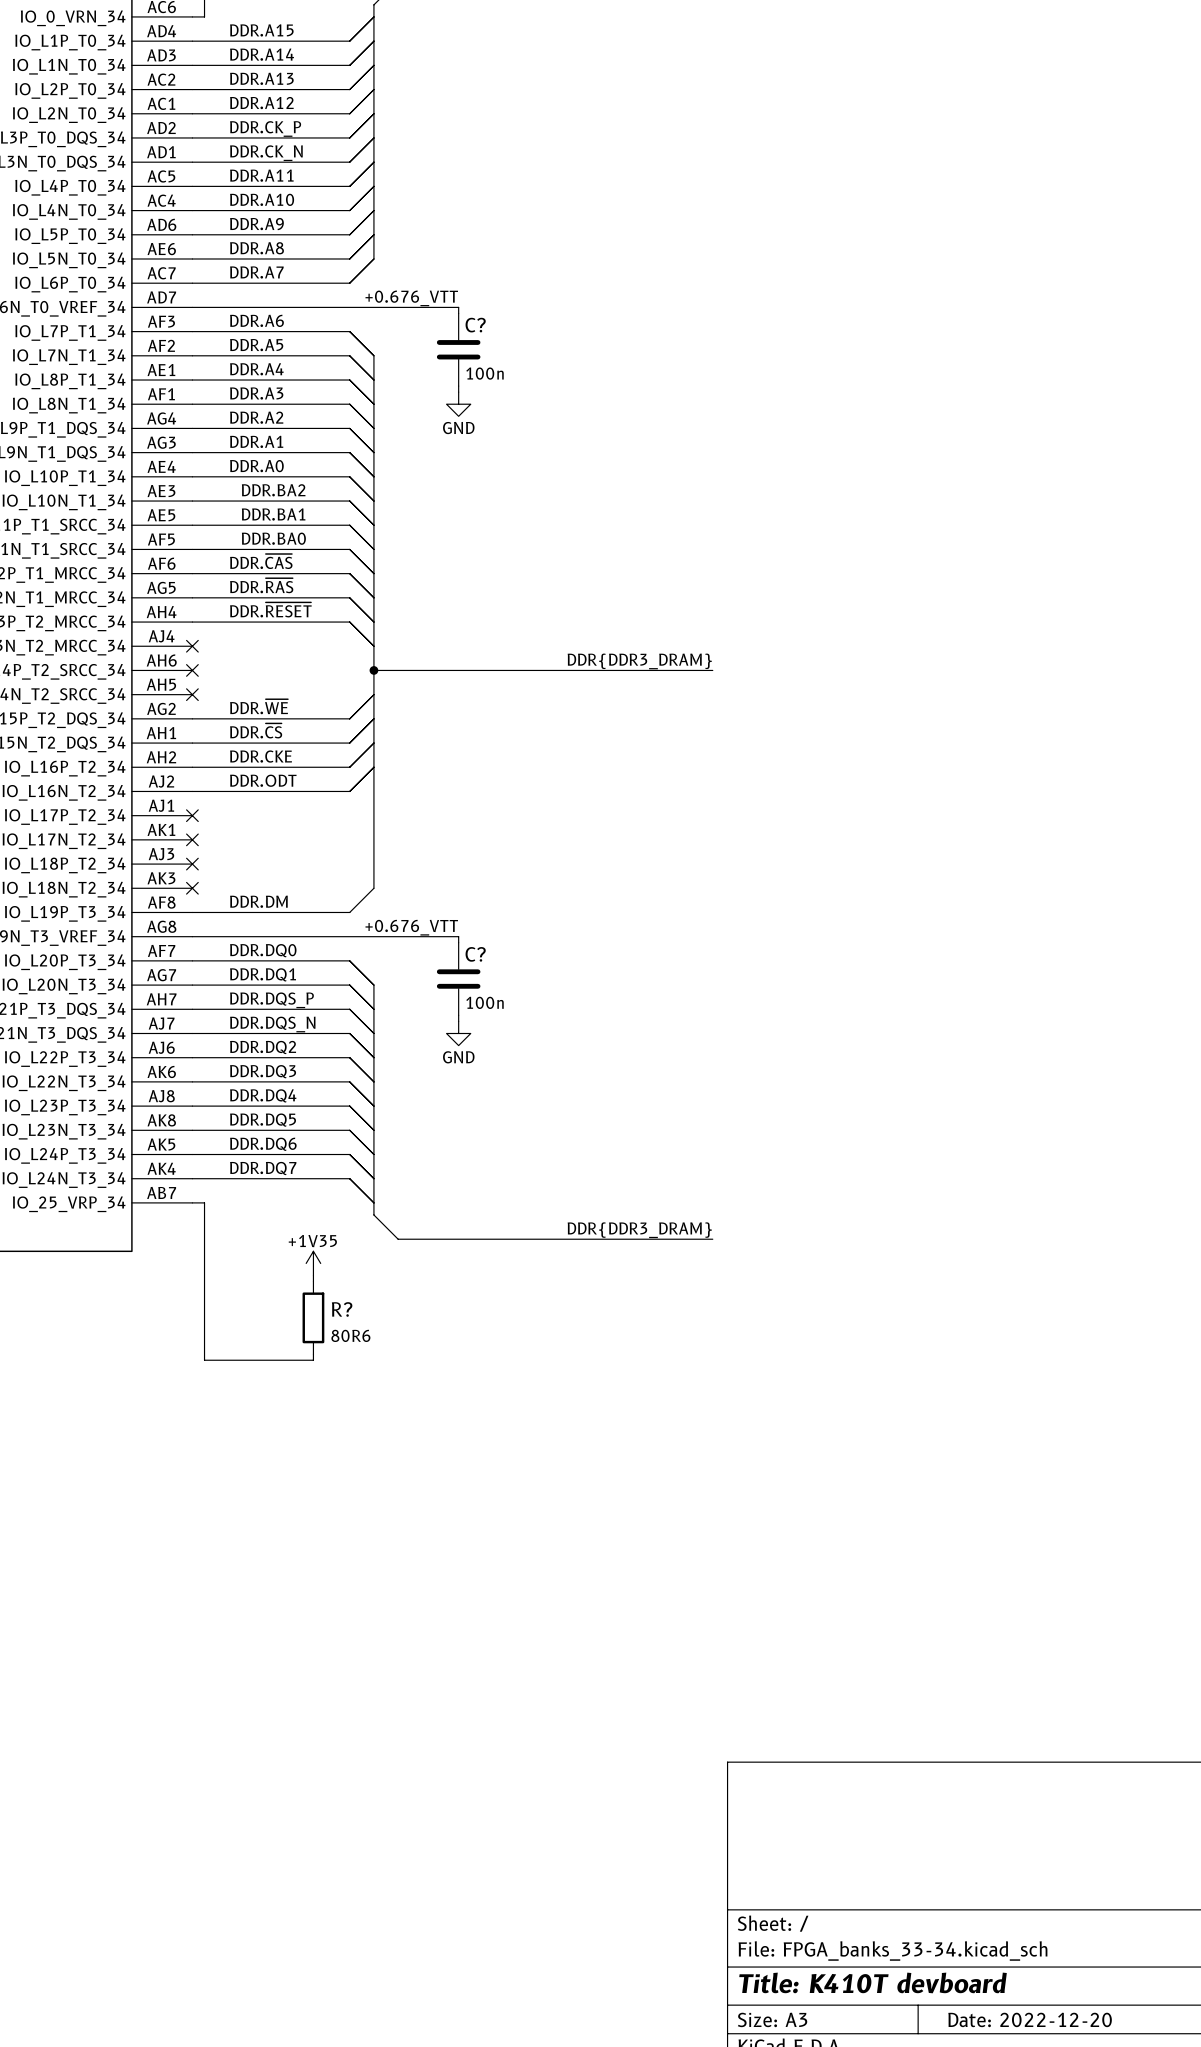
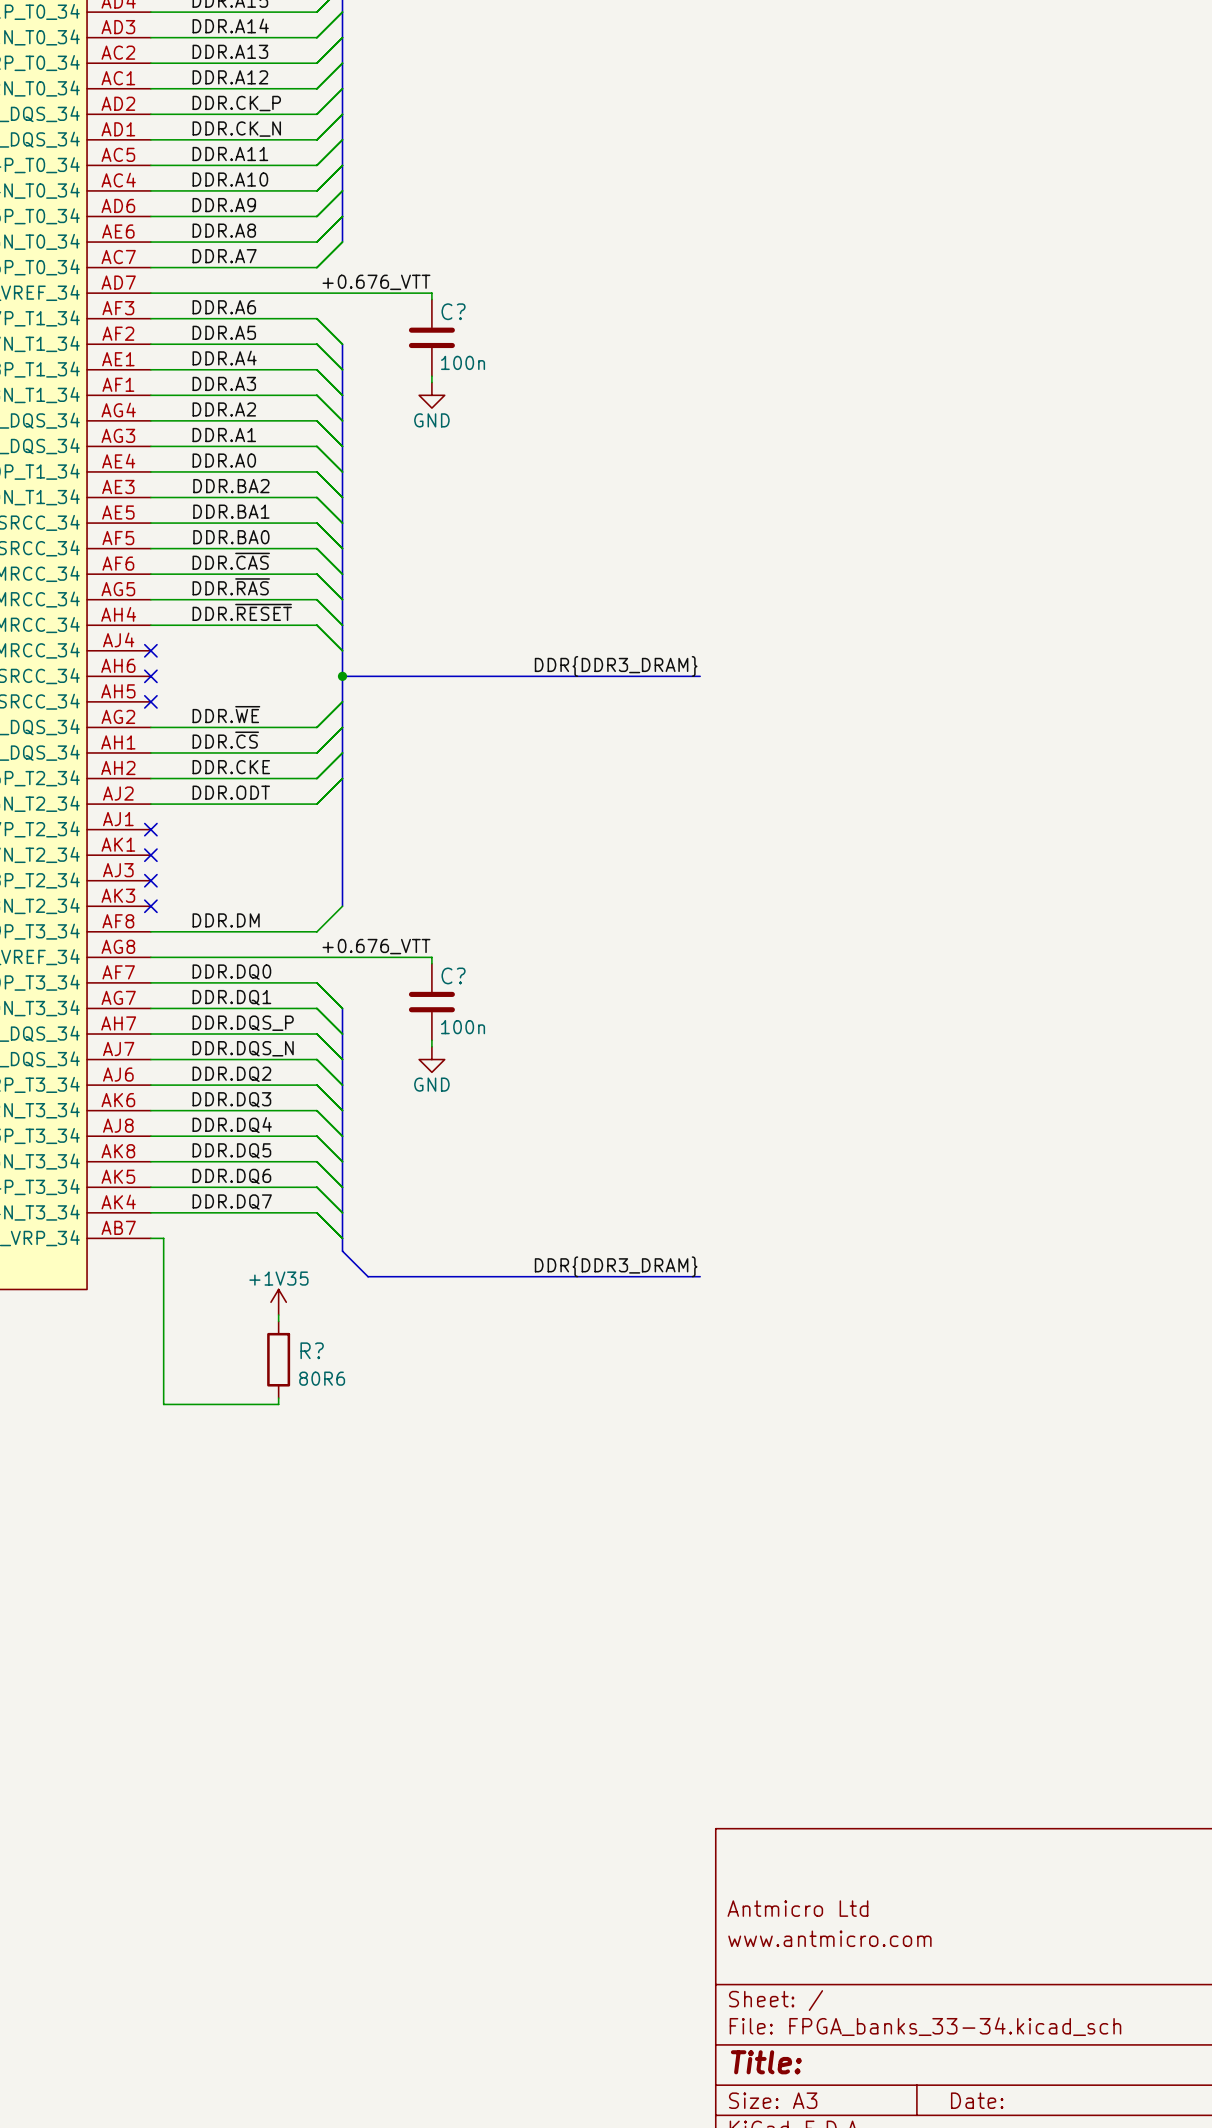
title block: none -> Antmicro Ltd (797, 1908)
title block: none -> www.antmicro.com (829, 1938)
title block: Title: K410T devboard (873, 1982) -> Title: (766, 2062)
title block: Date: 2022-12-20 (1030, 2019) -> Date: (977, 2100)

